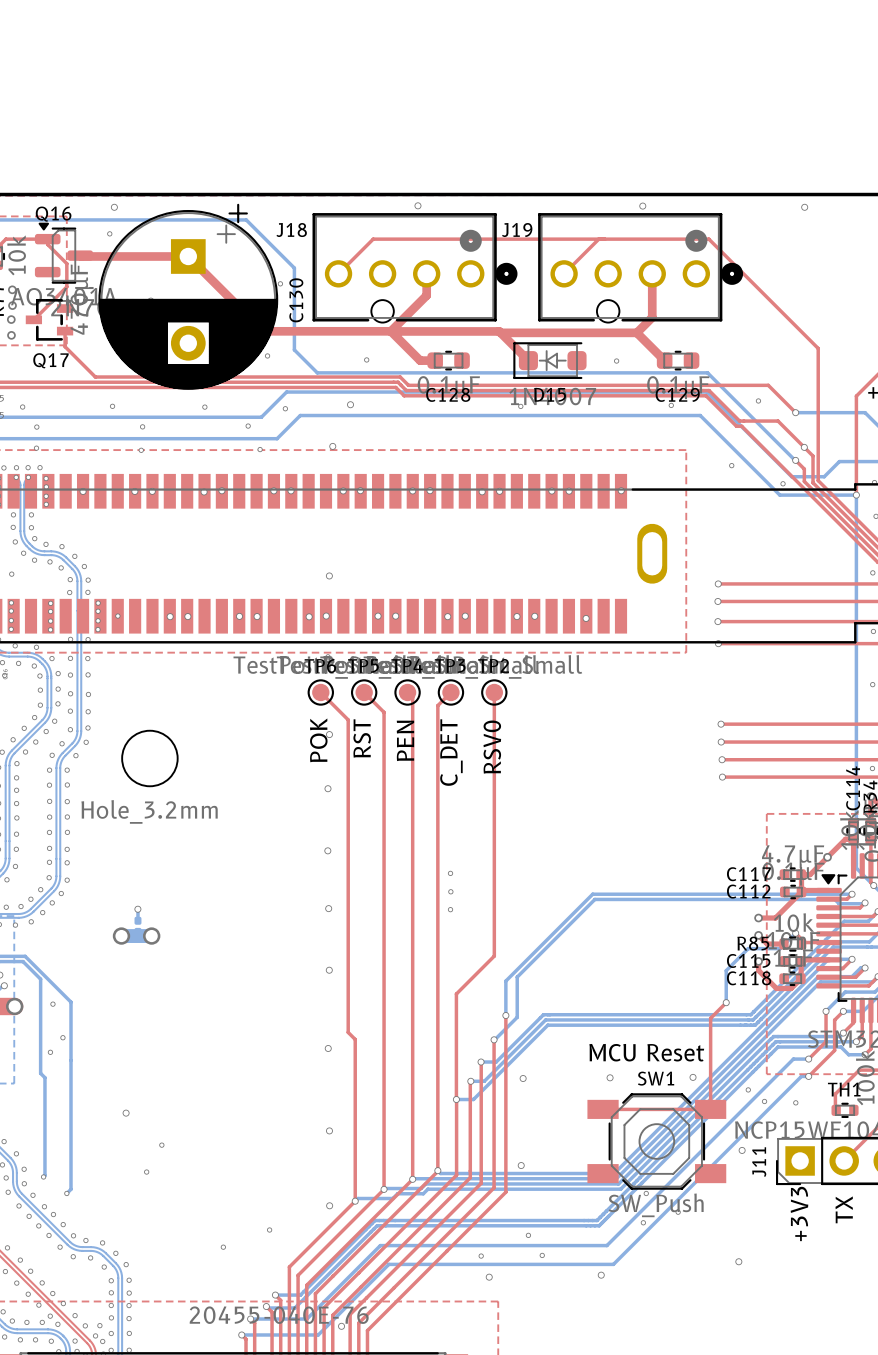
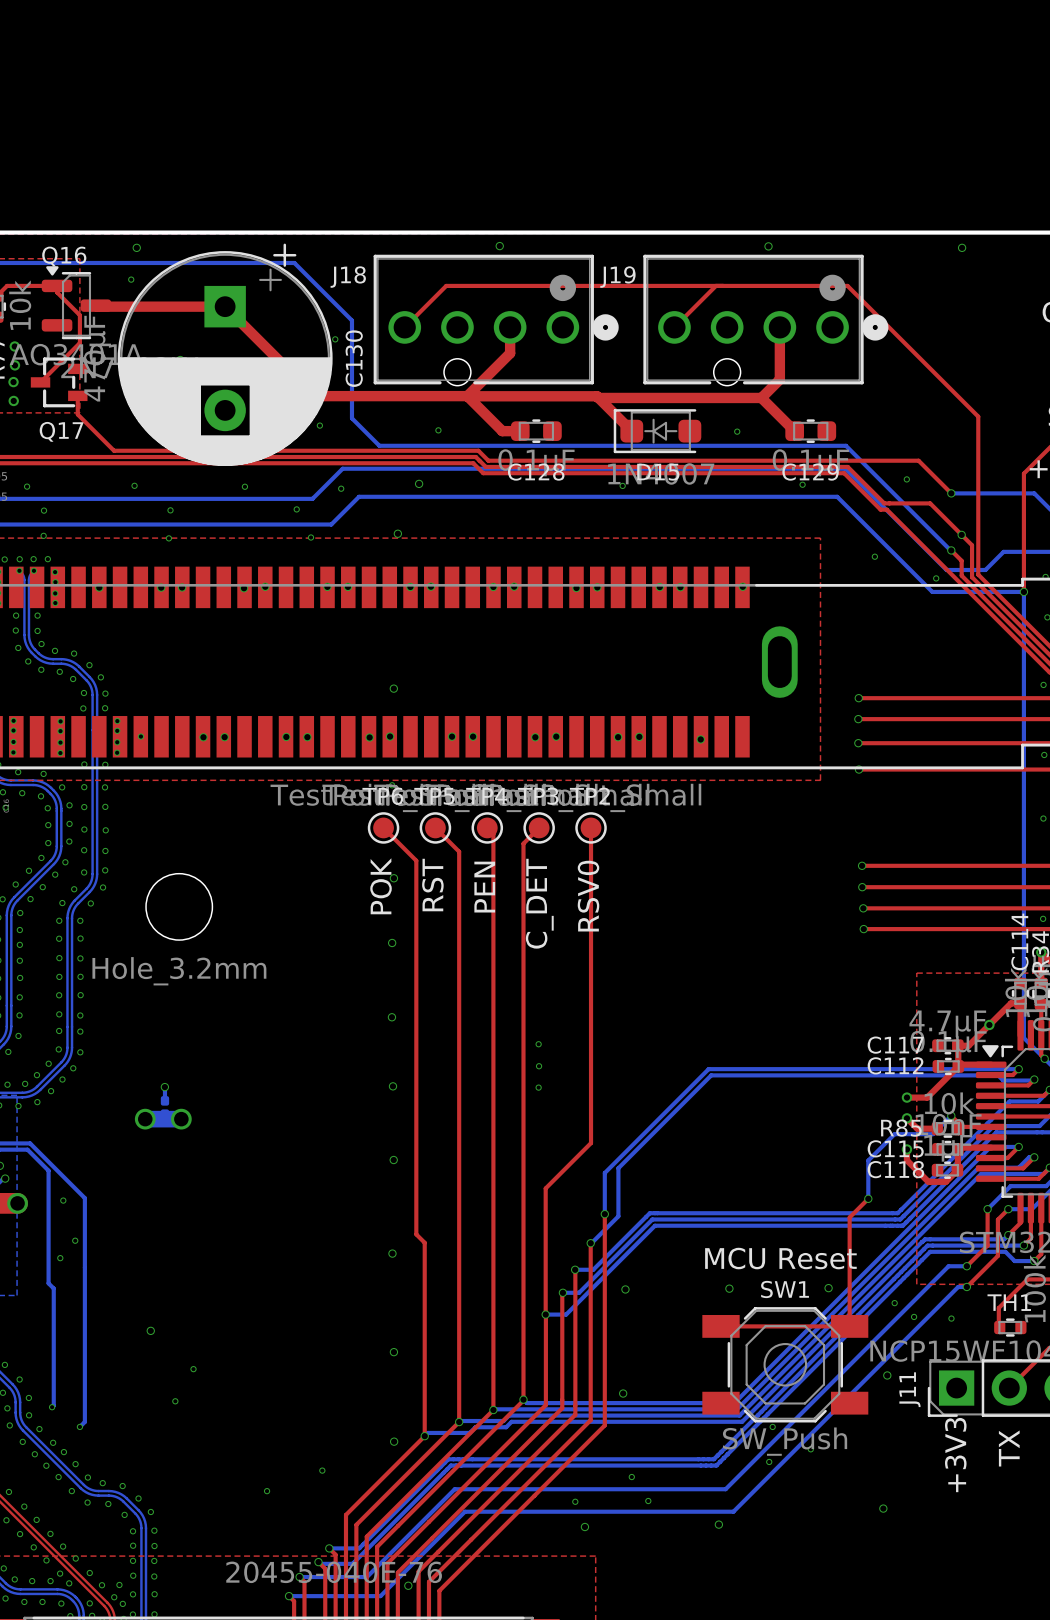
via: (11, 574) -> none

